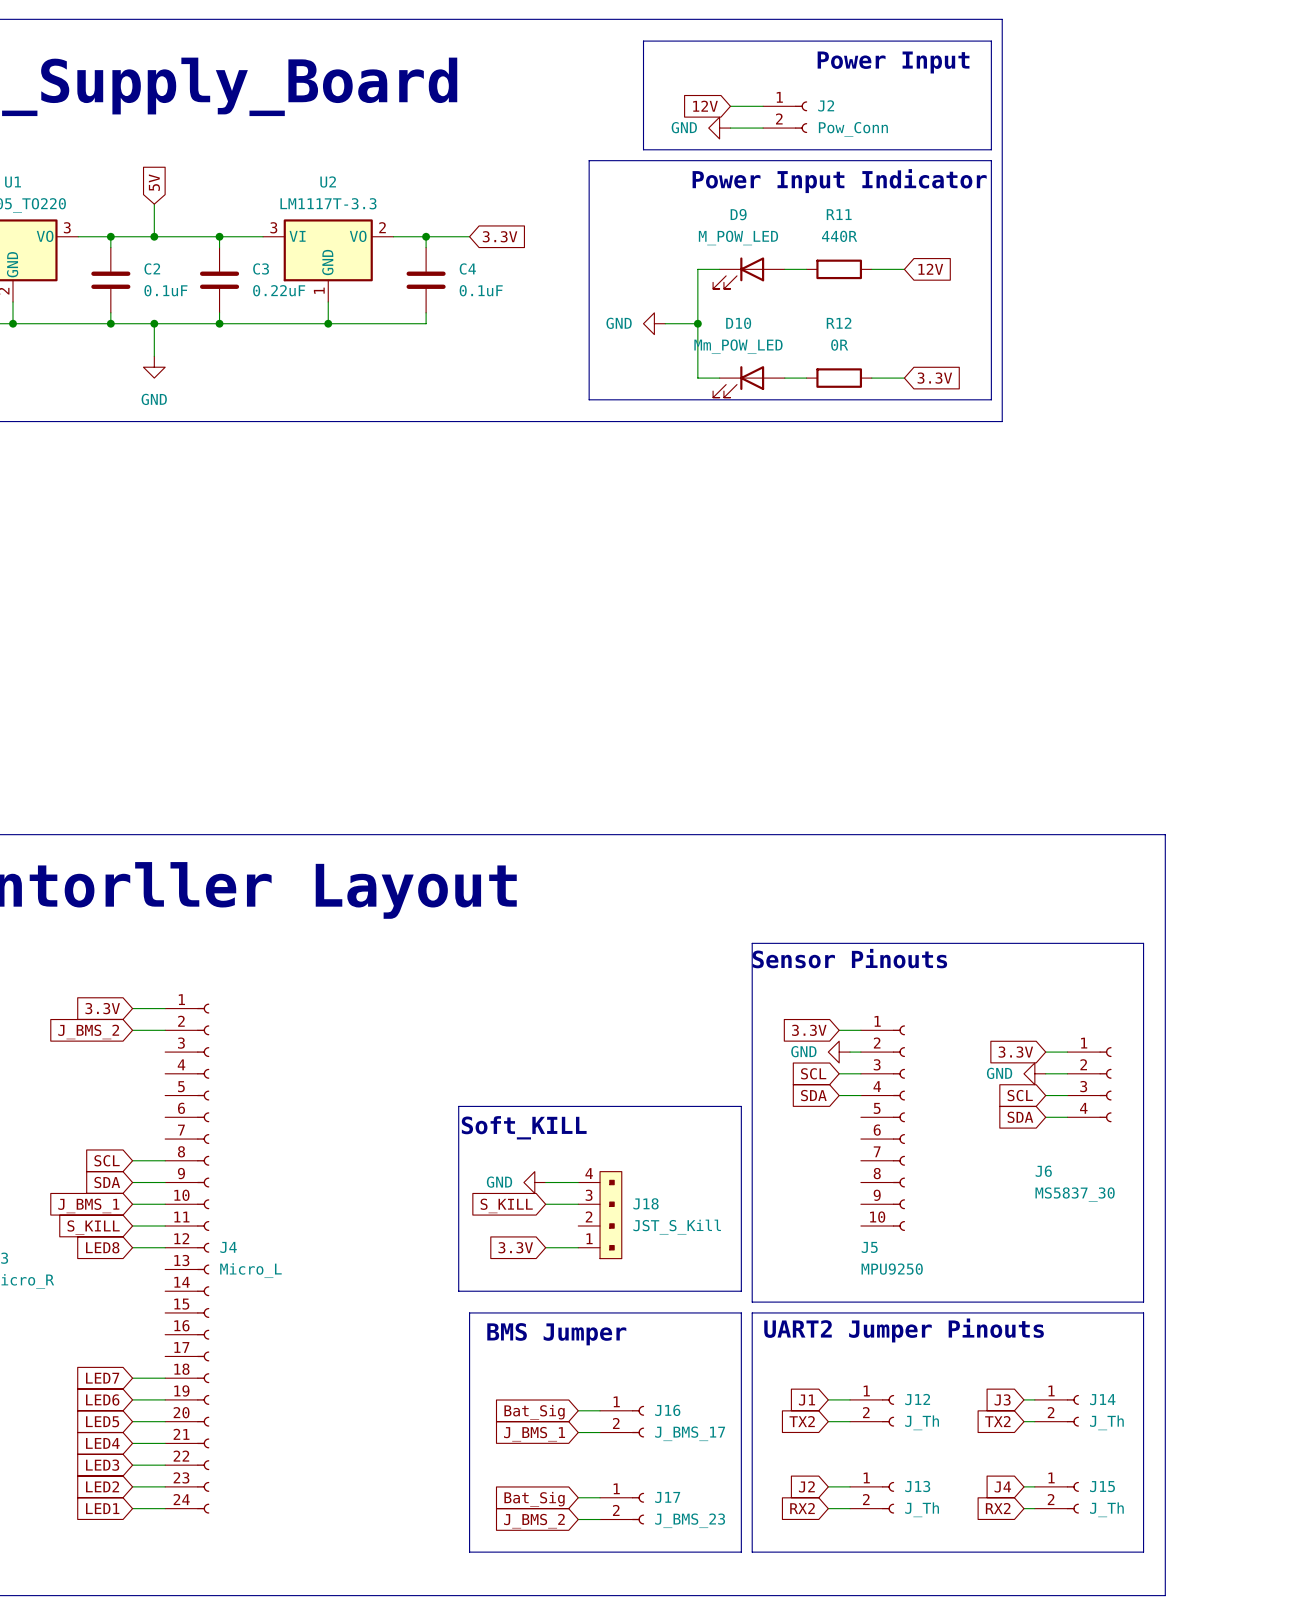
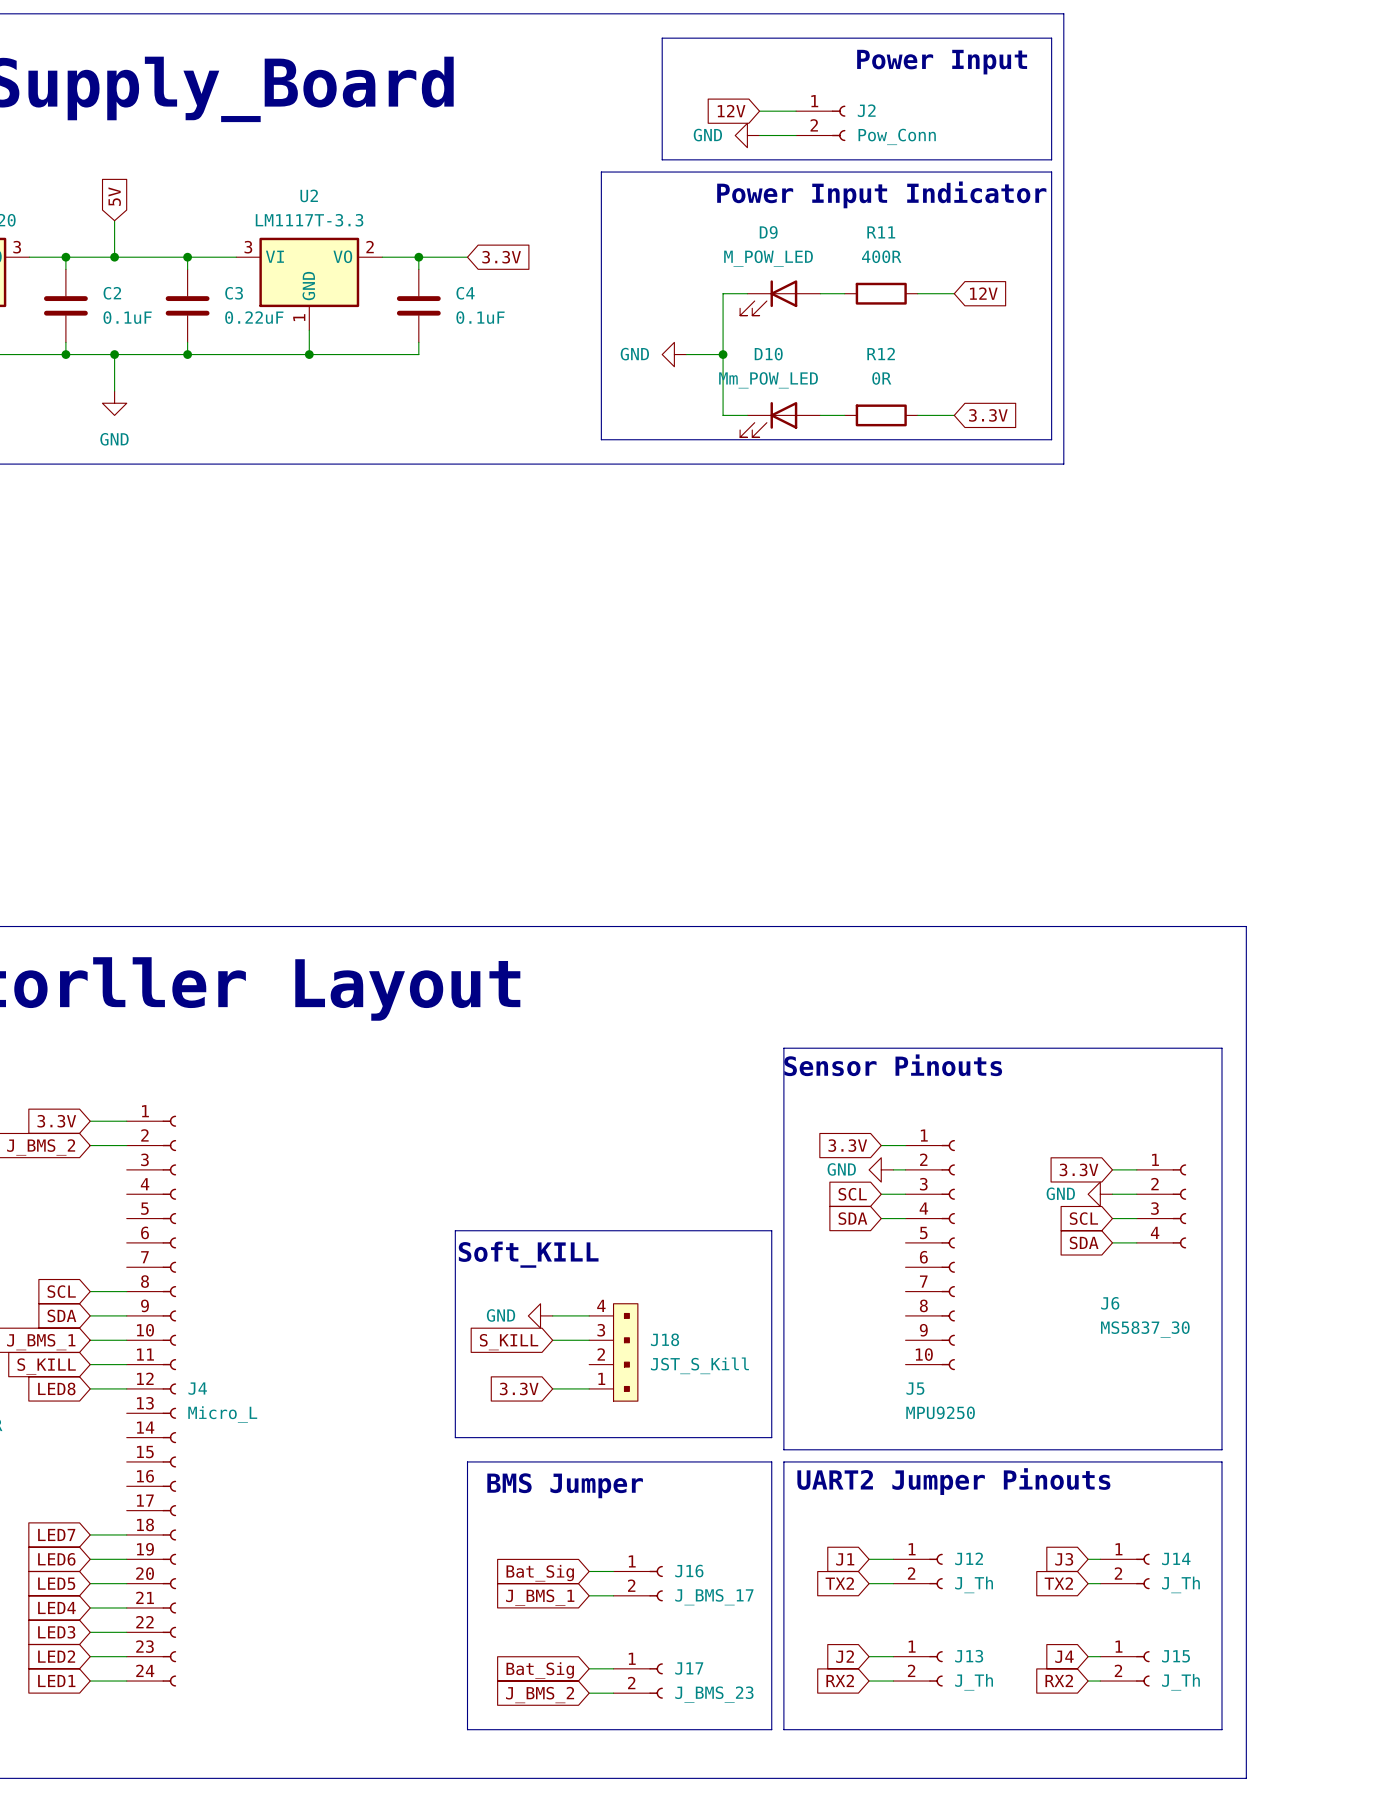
R11 value: 440R (839, 236) -> 400R (881, 256)

